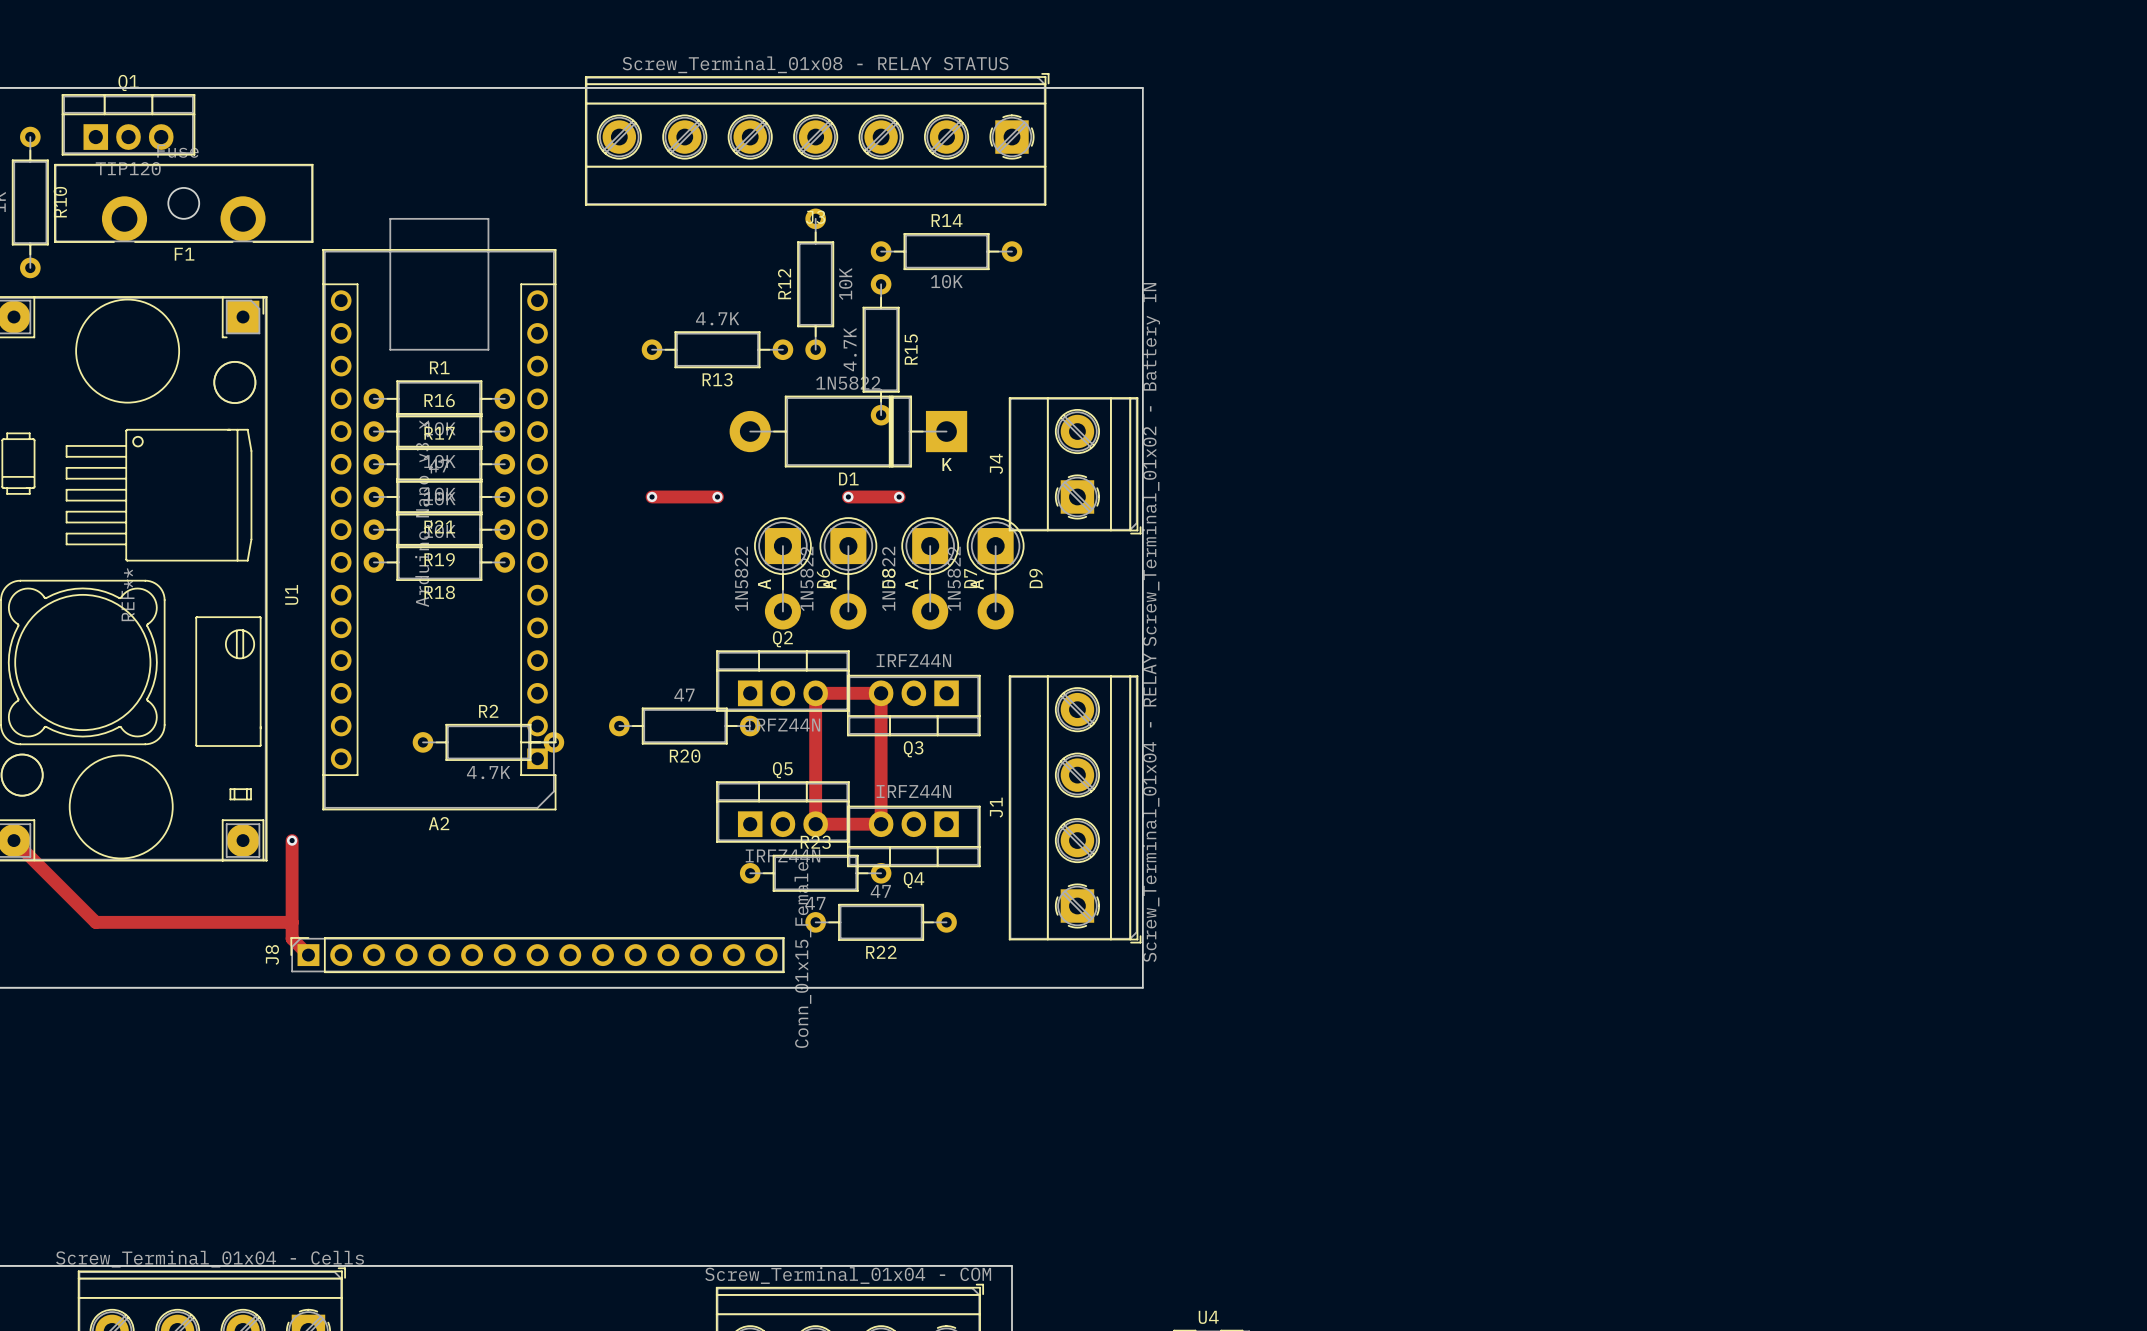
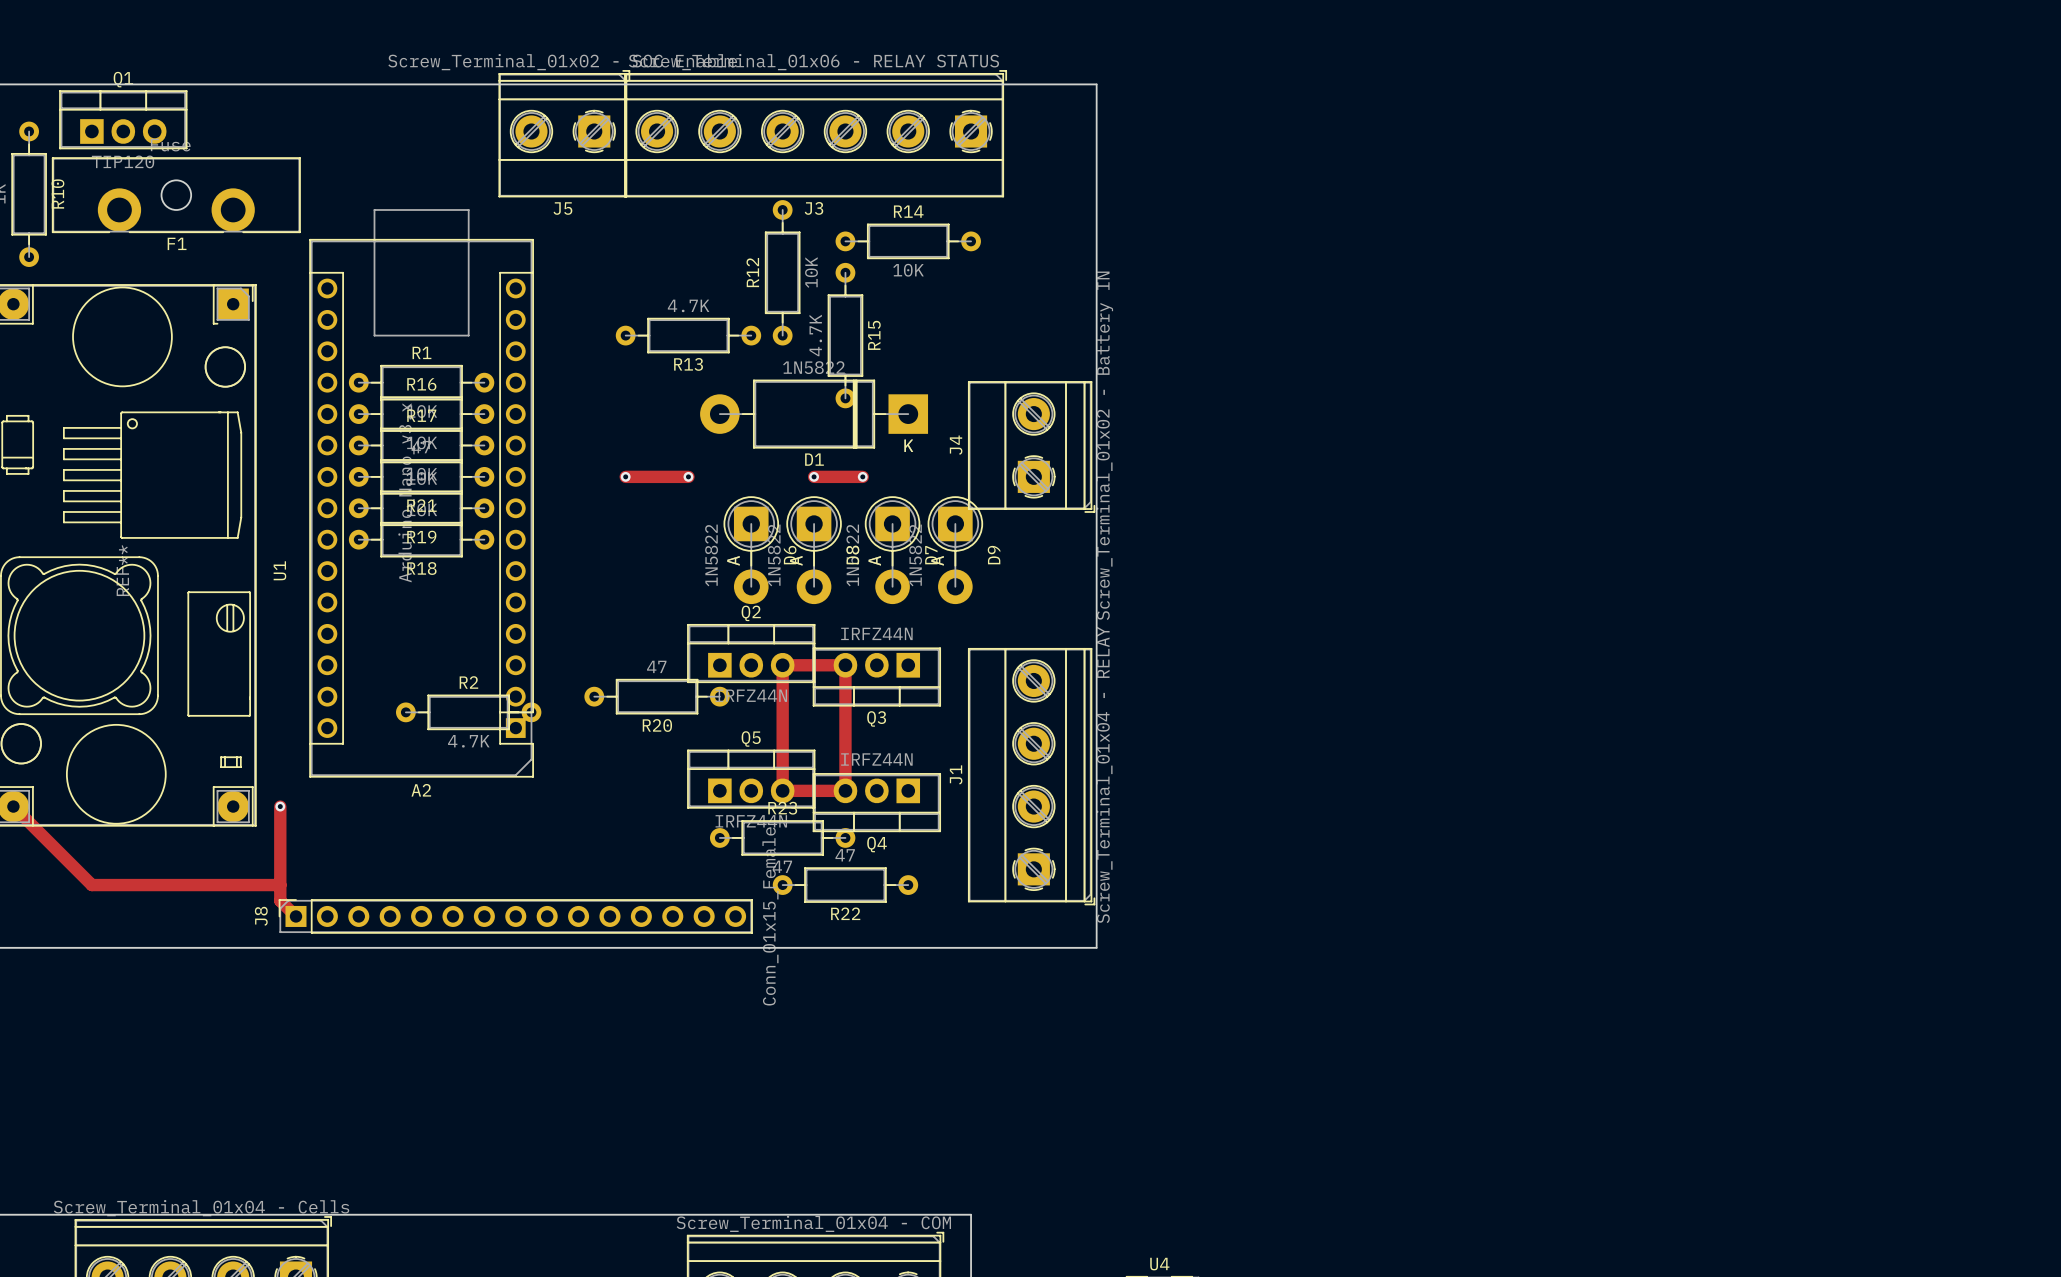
J3 value: Screw_Terminal_01x08 - RELAY STATUS (815, 64) -> Screw_Terminal_01x06 - RELAY STATUS (813, 62)
J3 footprint: [585, 73, 1050, 206] -> [624, 70, 1007, 198]
J5: none -> Screw_Terminal_01x02 - SOC Enable (564, 133)

